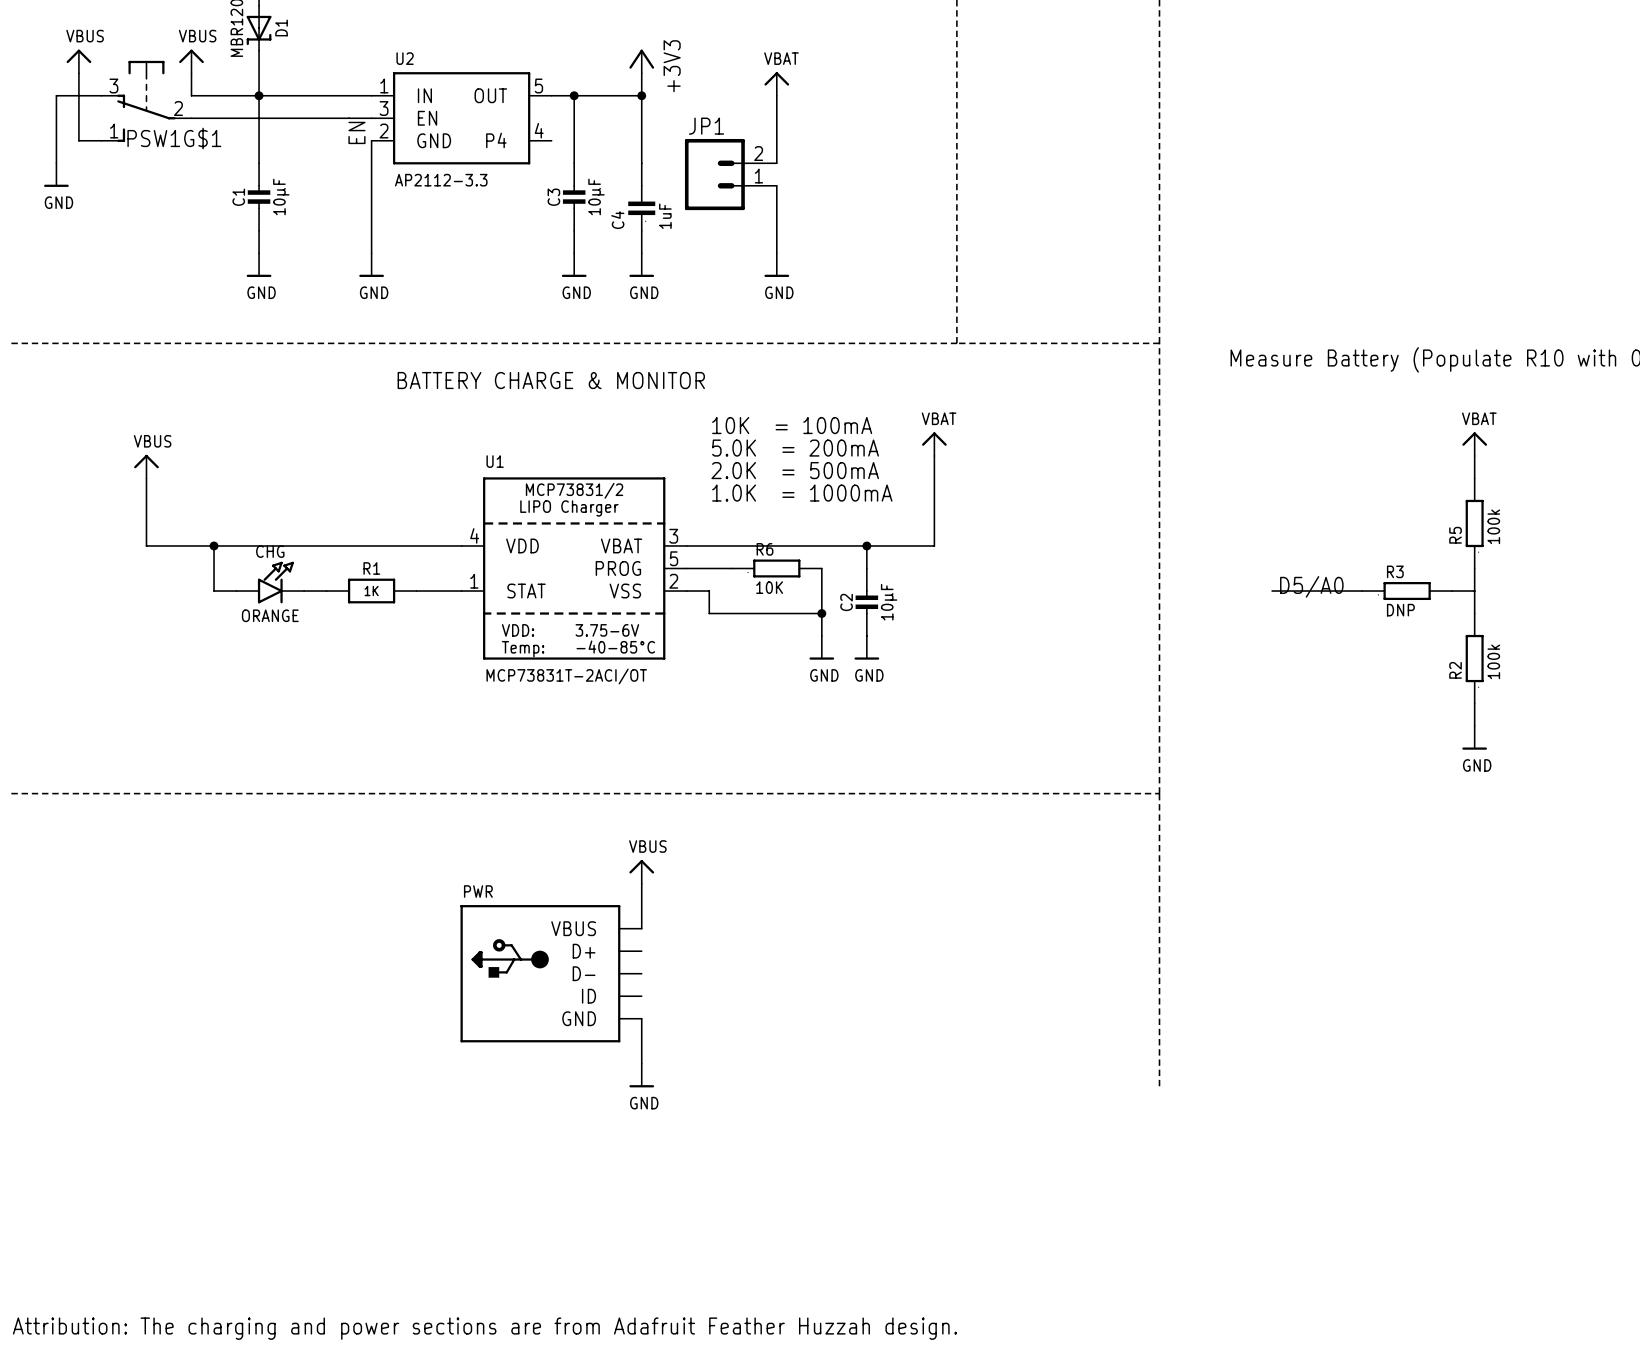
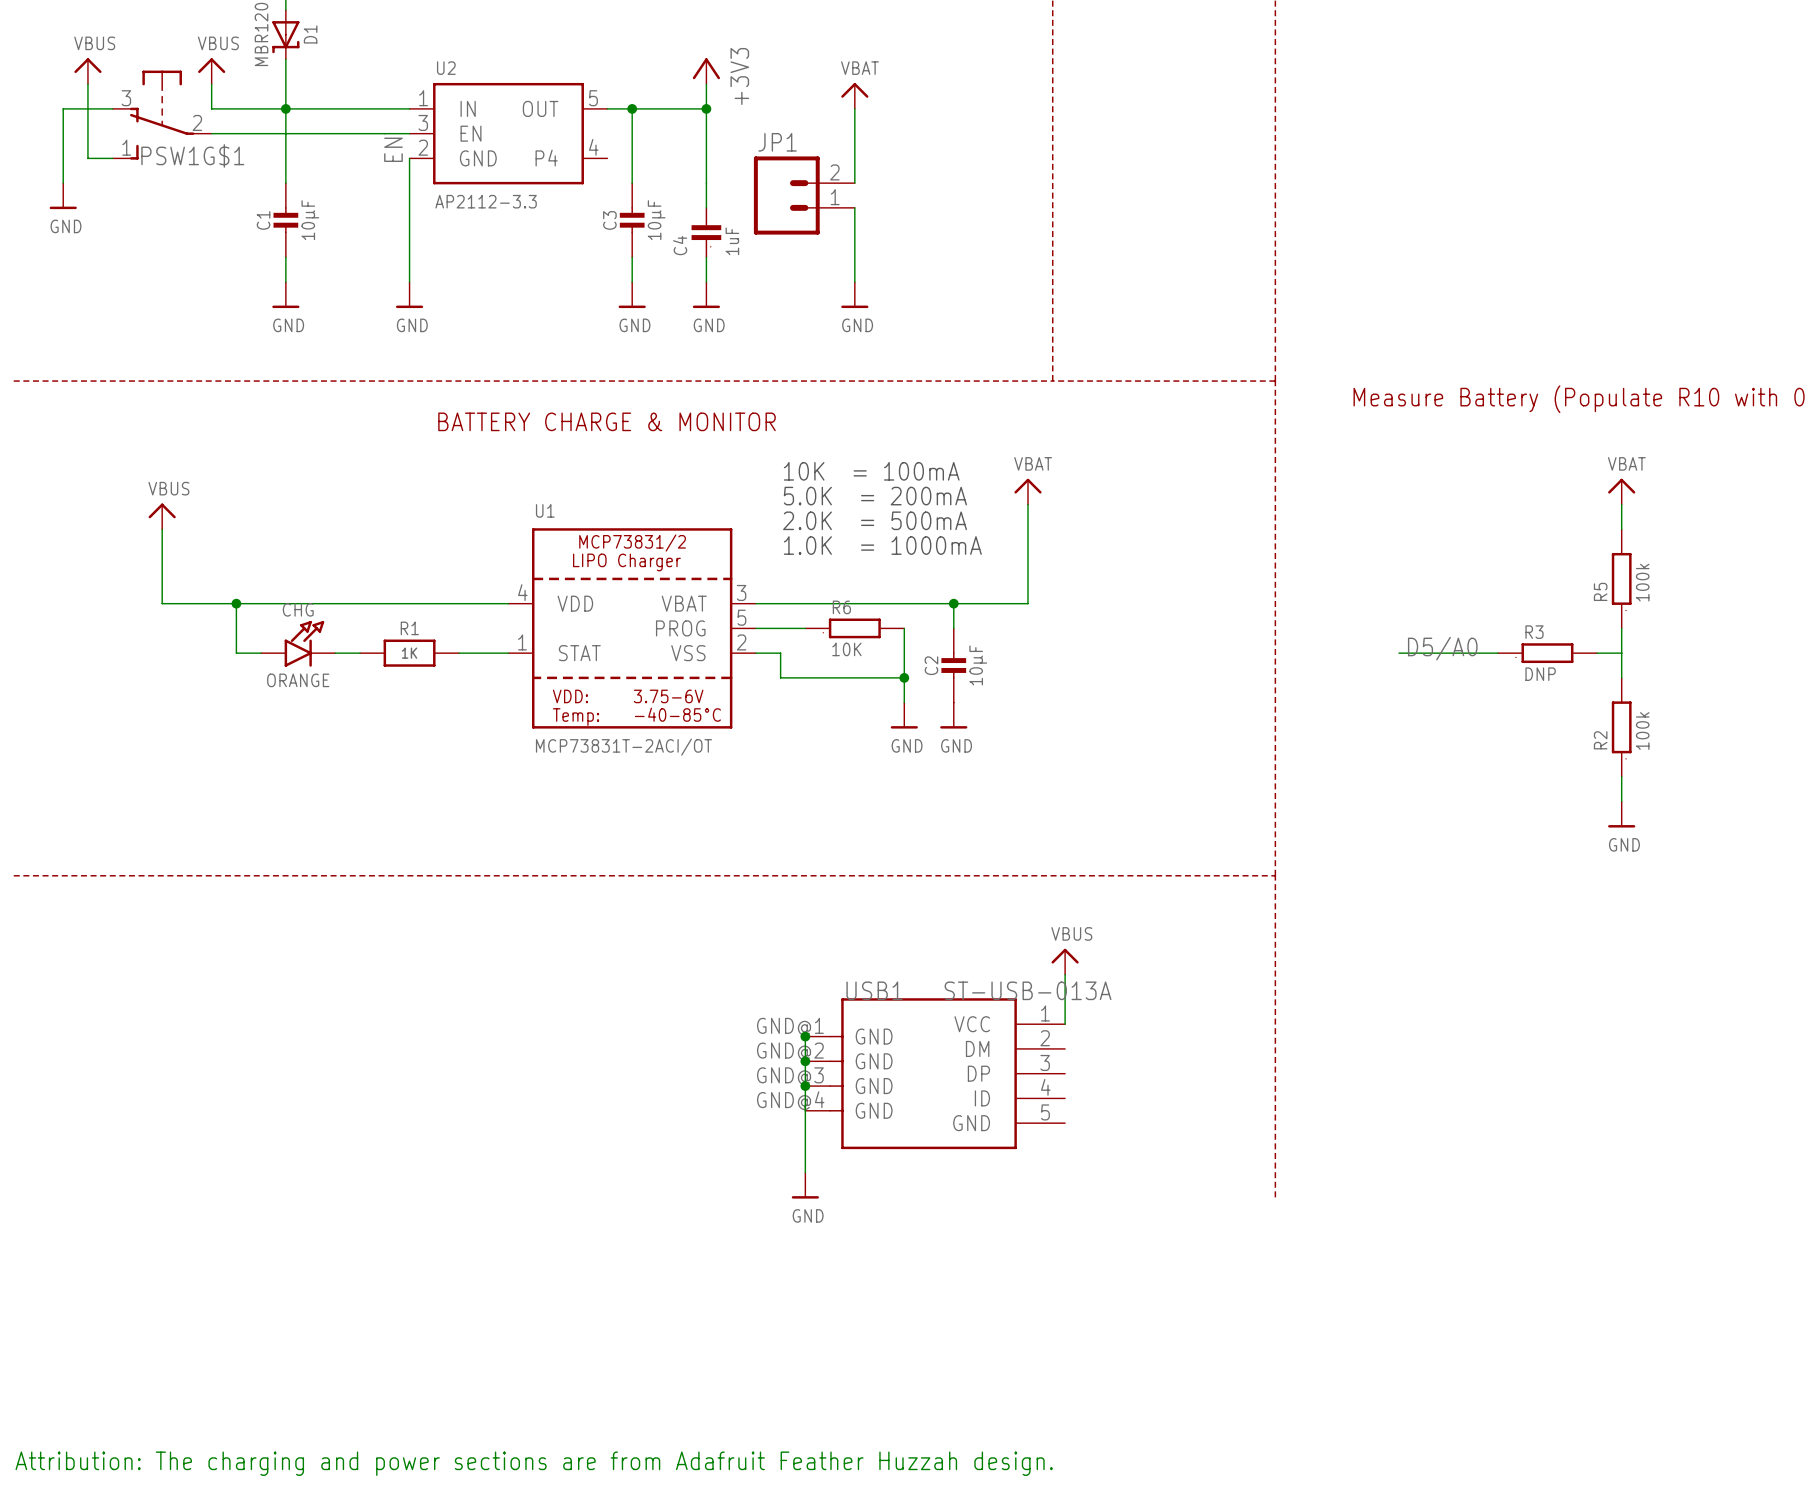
power symbol: VBUS (641, 871) -> none
power symbol: none -> VBUS (1065, 961)
wire: (641, 883) (641, 928) -> none
wire: none -> (1065, 974) (1065, 1024)
wire: none -> (805, 1036) (805, 1172)
junction: none -> (805, 1036)
junction: none -> (805, 1061)
PWR: (550, 973) -> none
USB1: none -> ST-USB-013A (935, 1073)
junction: none -> (805, 1086)
wire: (641, 1018) (641, 1063) -> none
power symbol position: GND (641, 1075) -> GND (805, 1185)

